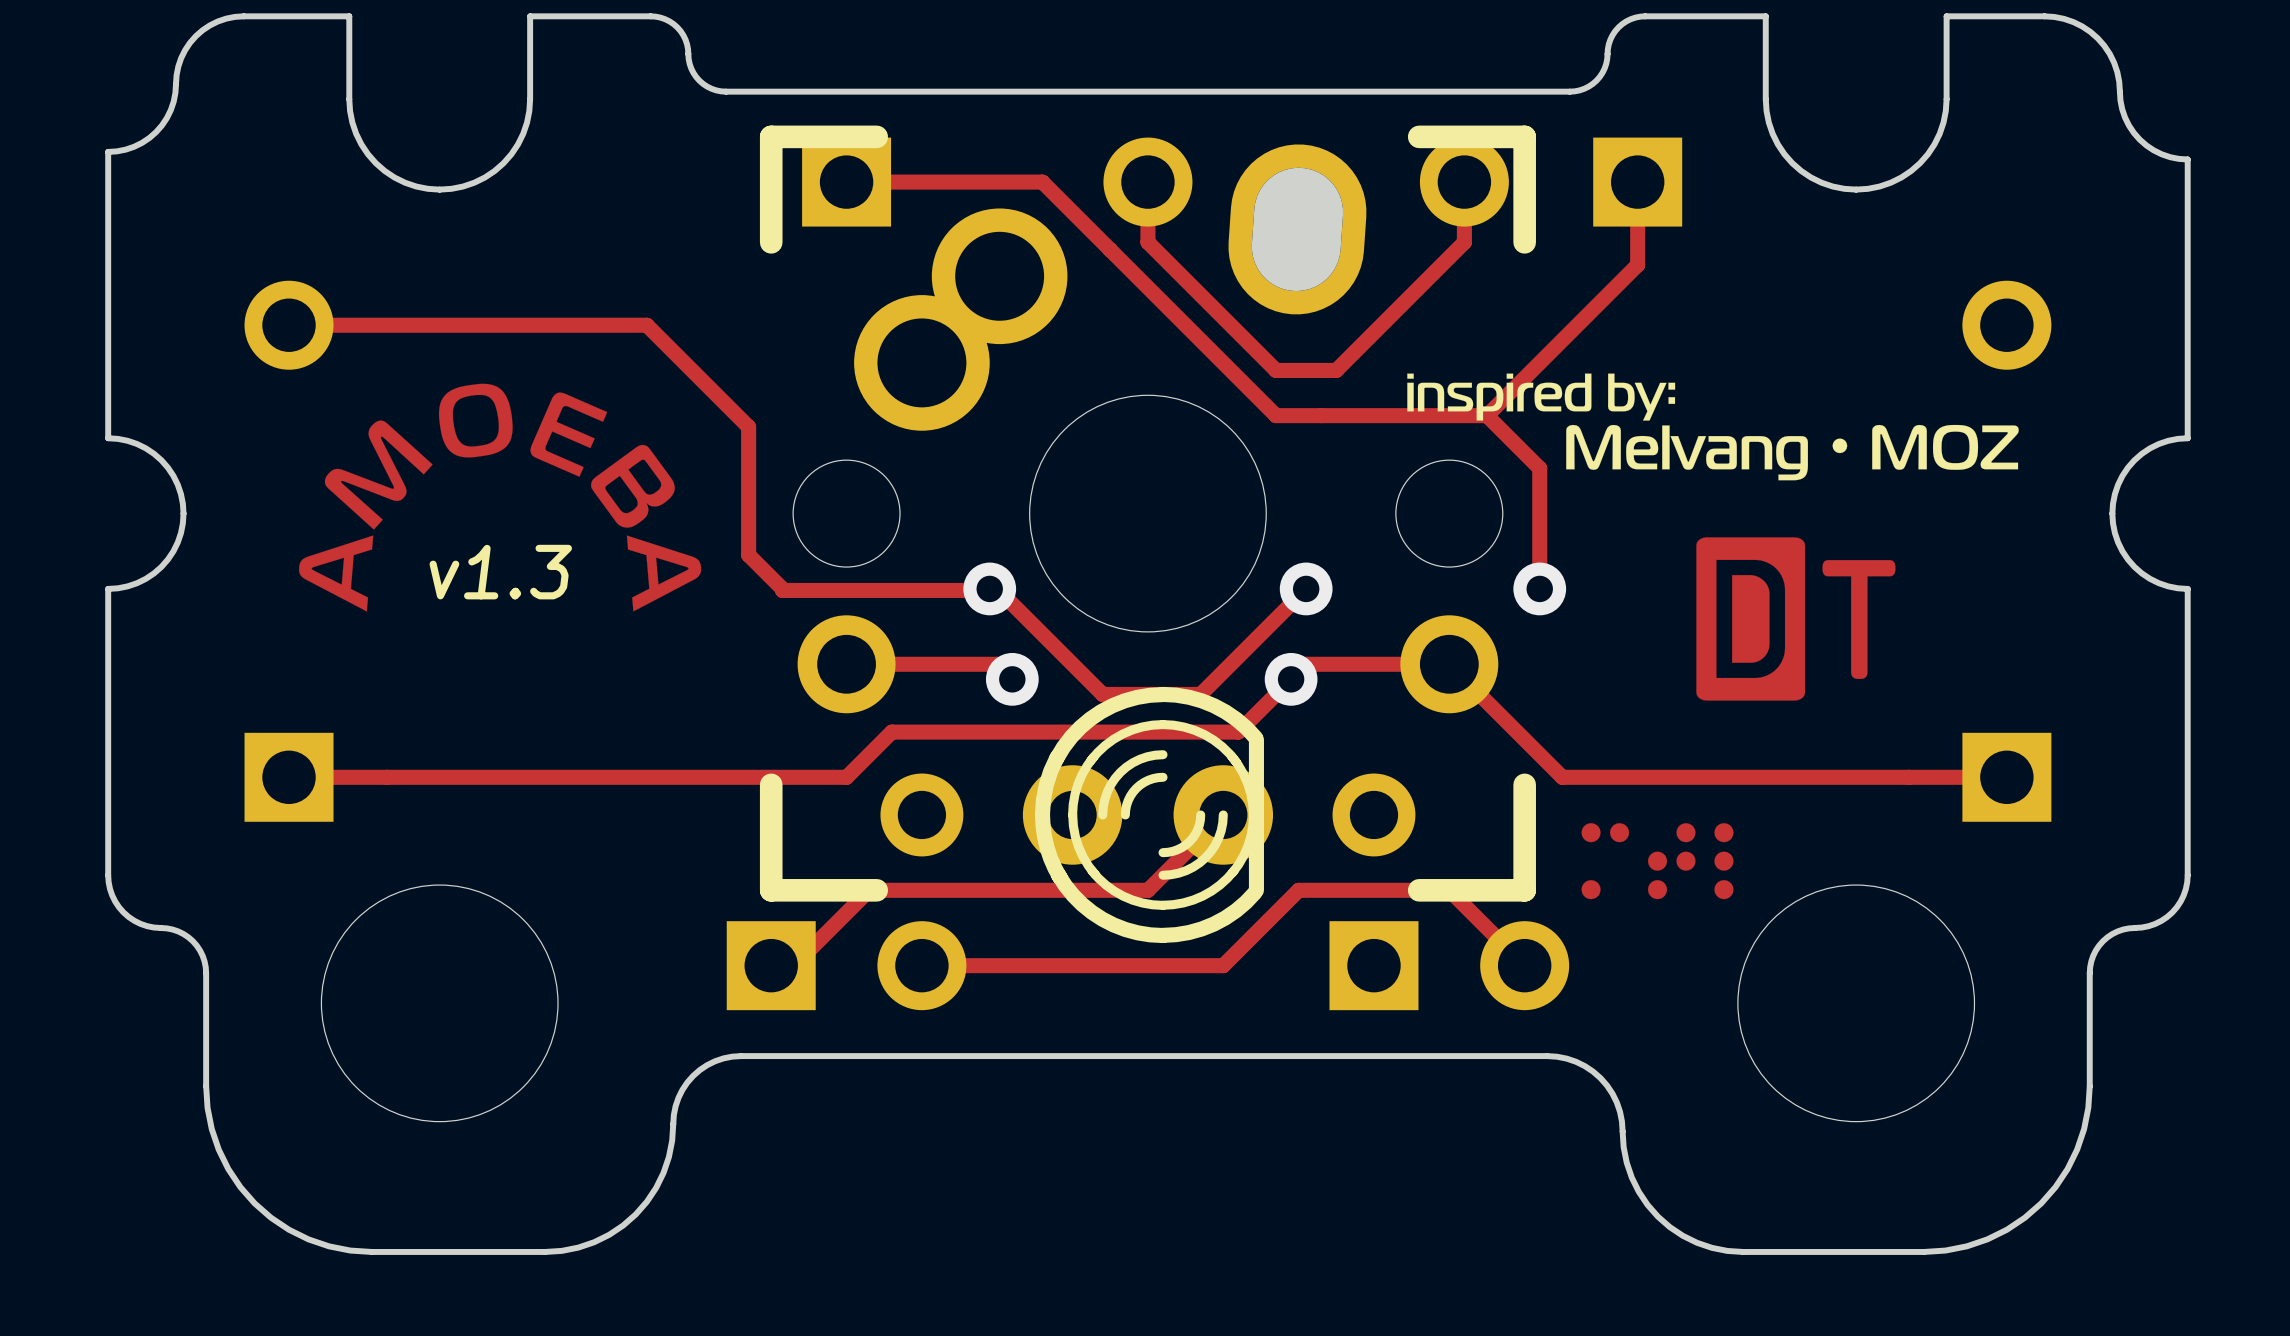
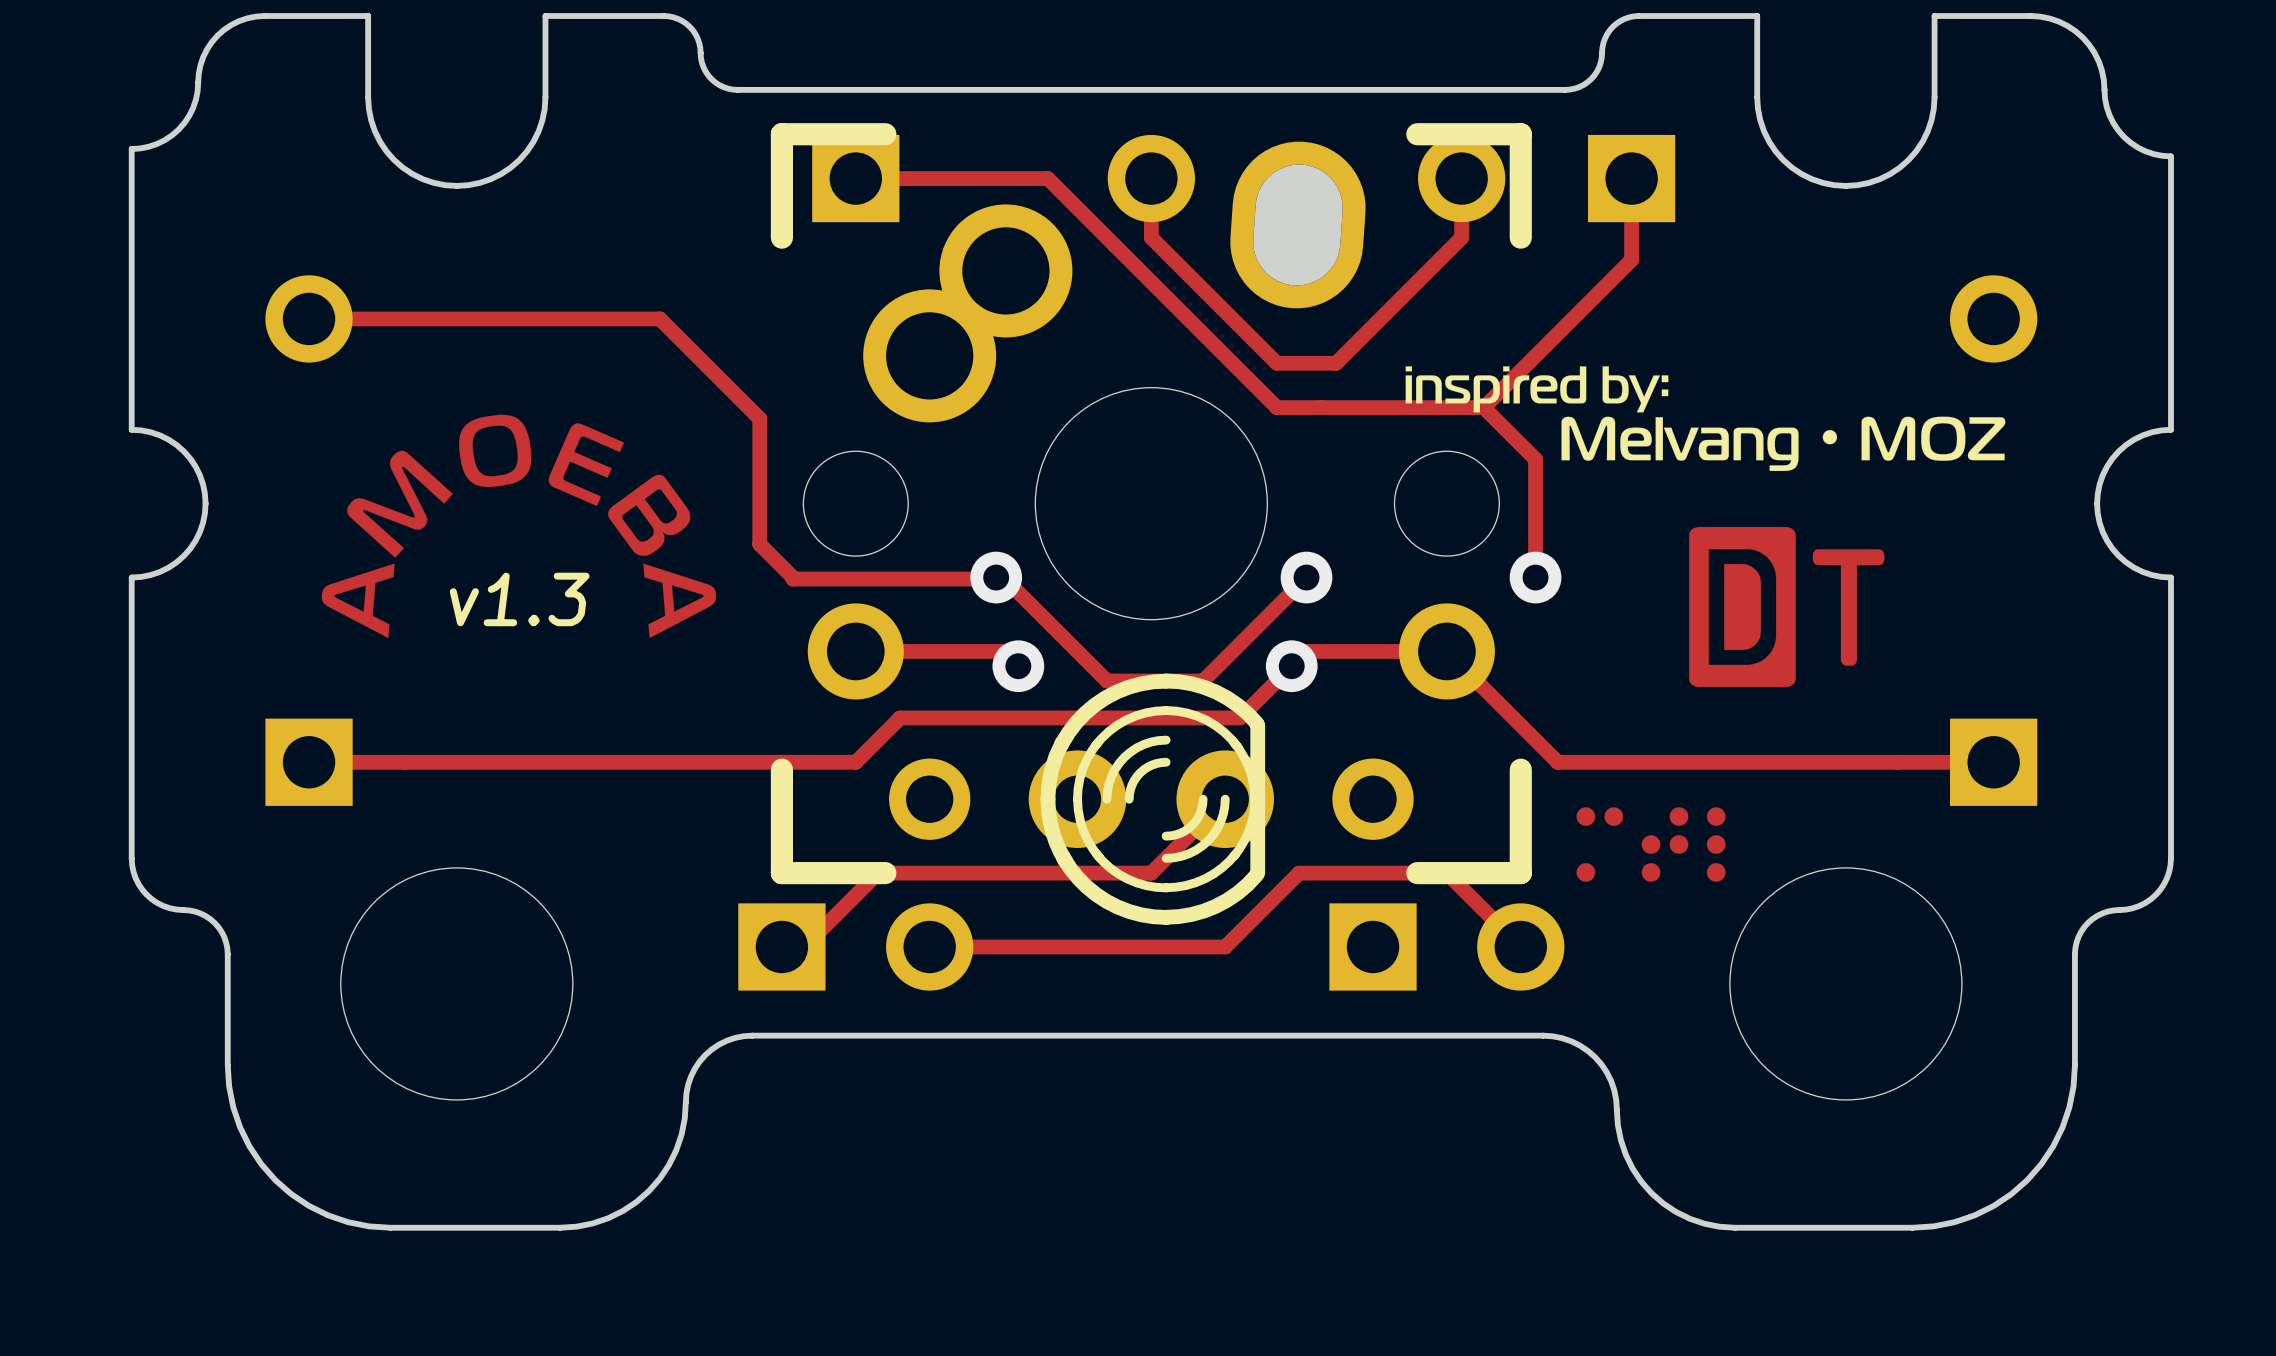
drawing position: (500, 497) -> (518, 526)
text position: v1.3 (500, 572) -> v1.3 (519, 599)

